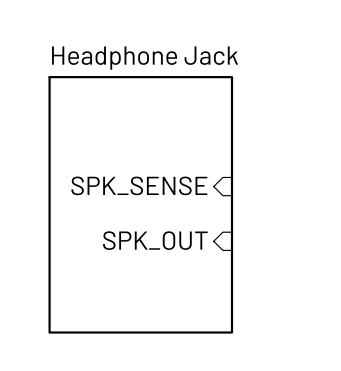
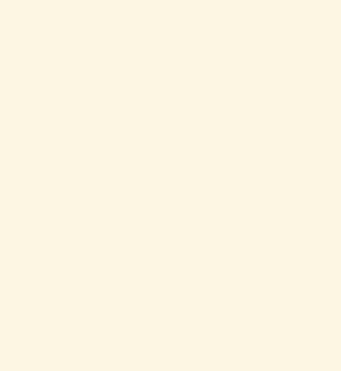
sheet pin: SPK_SENSE (139, 185) -> none
sheet Headphone Jack: (140, 204) -> none
sheet pin: SPK_OUT (155, 240) -> none

